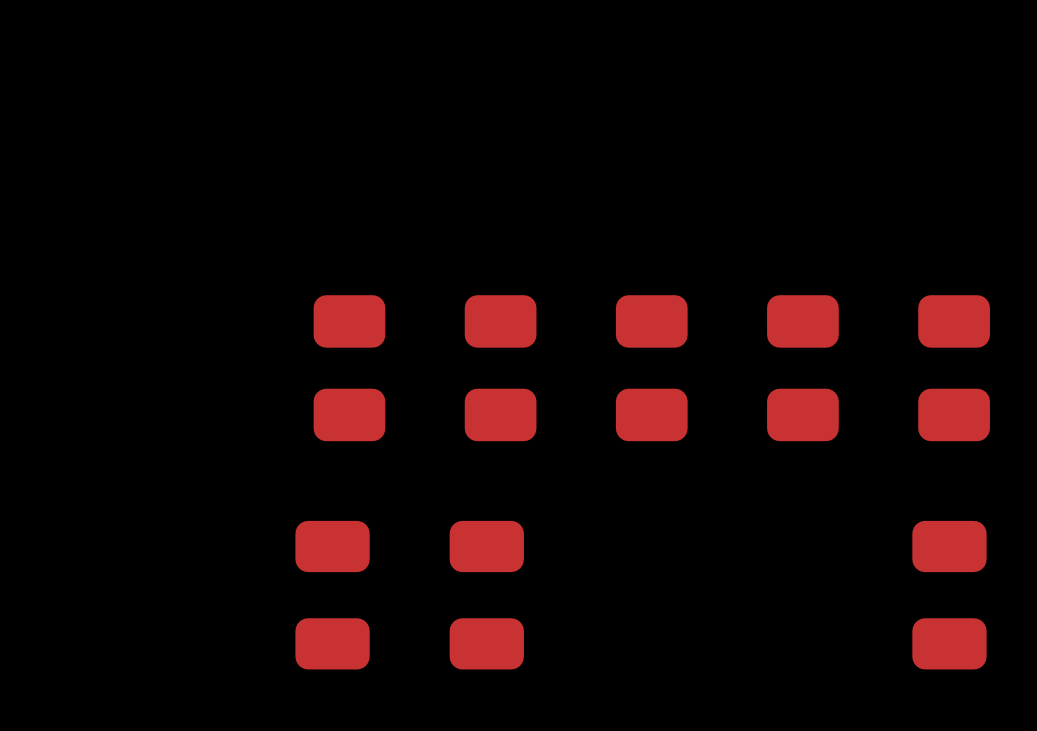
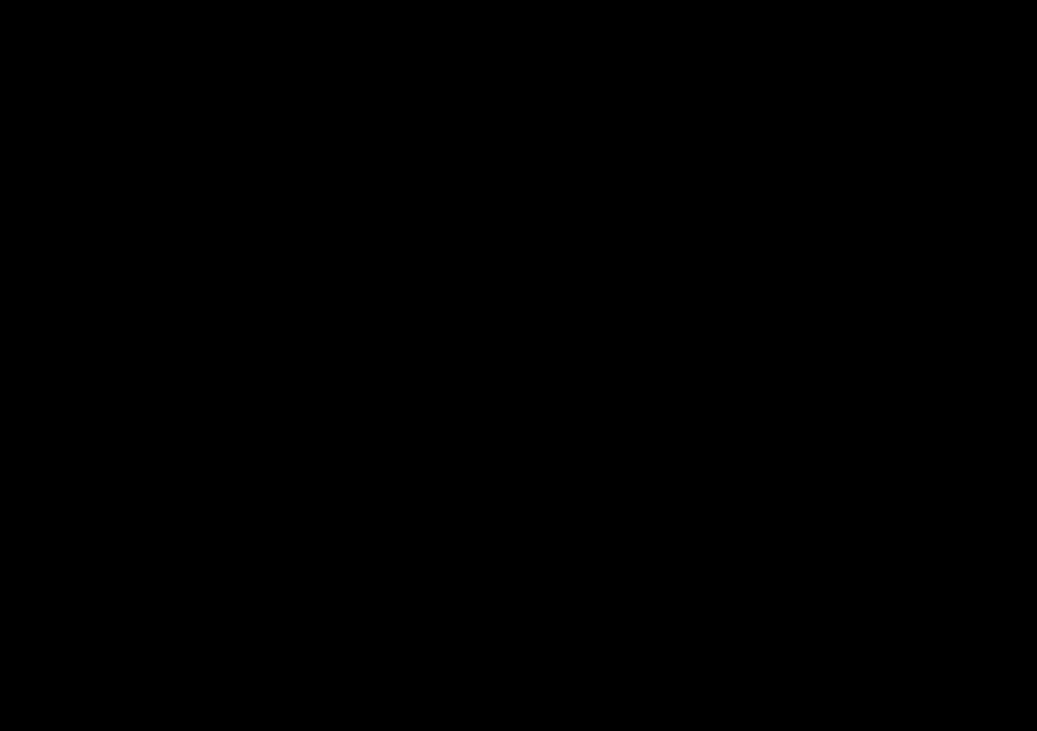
part: (349, 368) -> none
part: (500, 368) -> none
part: (651, 368) -> none
part: (802, 368) -> none
part: (954, 368) -> none
part: (332, 595) -> none
part: (486, 595) -> none
part: (949, 595) -> none

